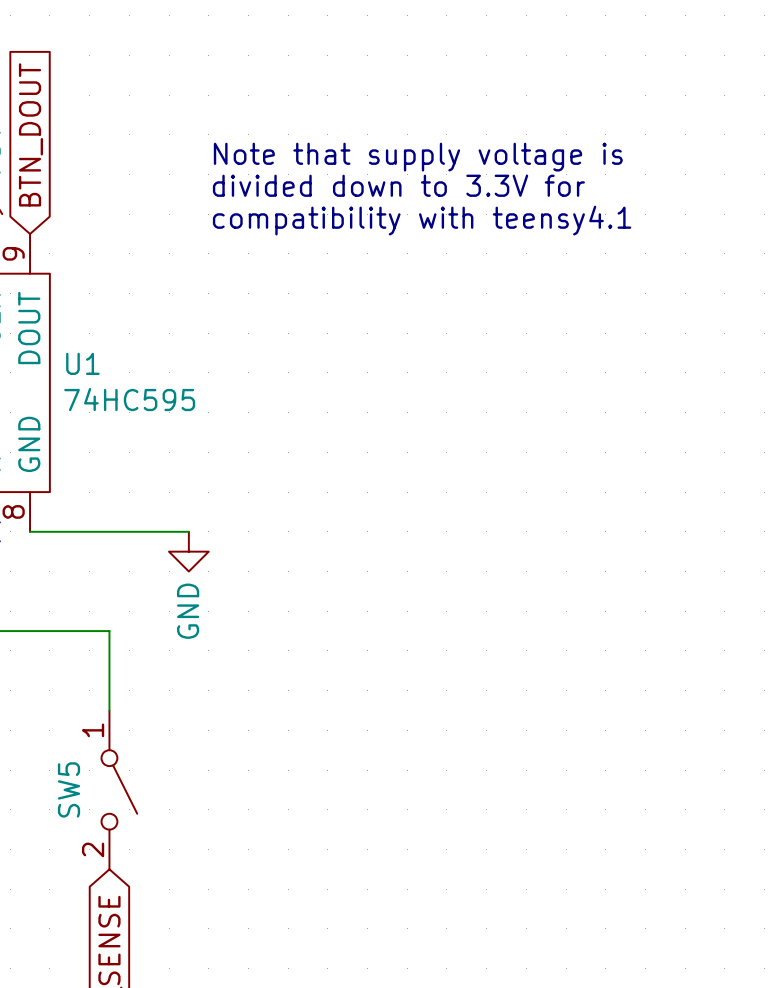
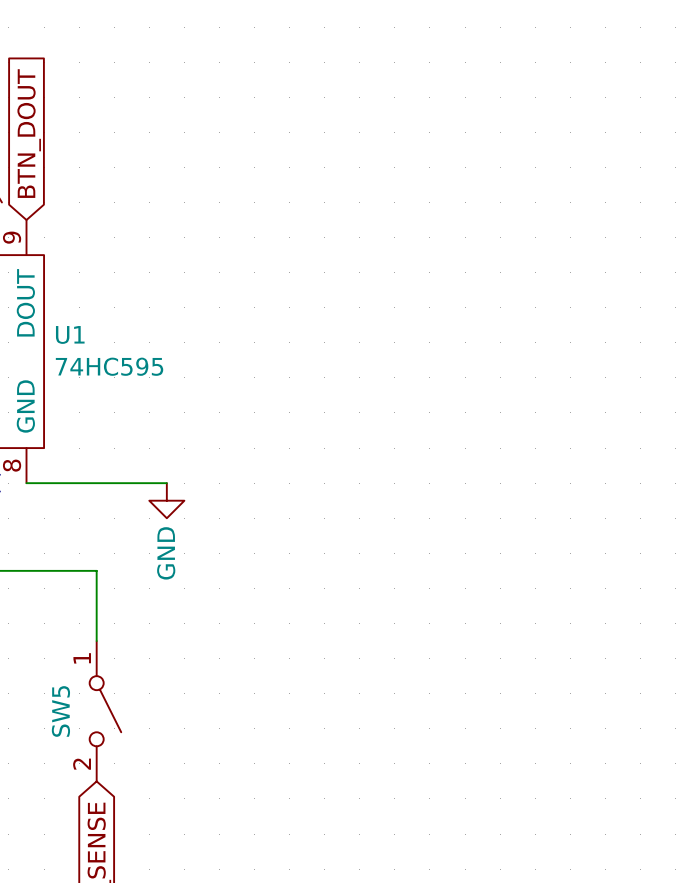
text: Note that supply voltage is (418, 157) -> none
text: divided down to 3.3V for (398, 185) -> none
text: compatibility with teensy4.1 (422, 220) -> none

